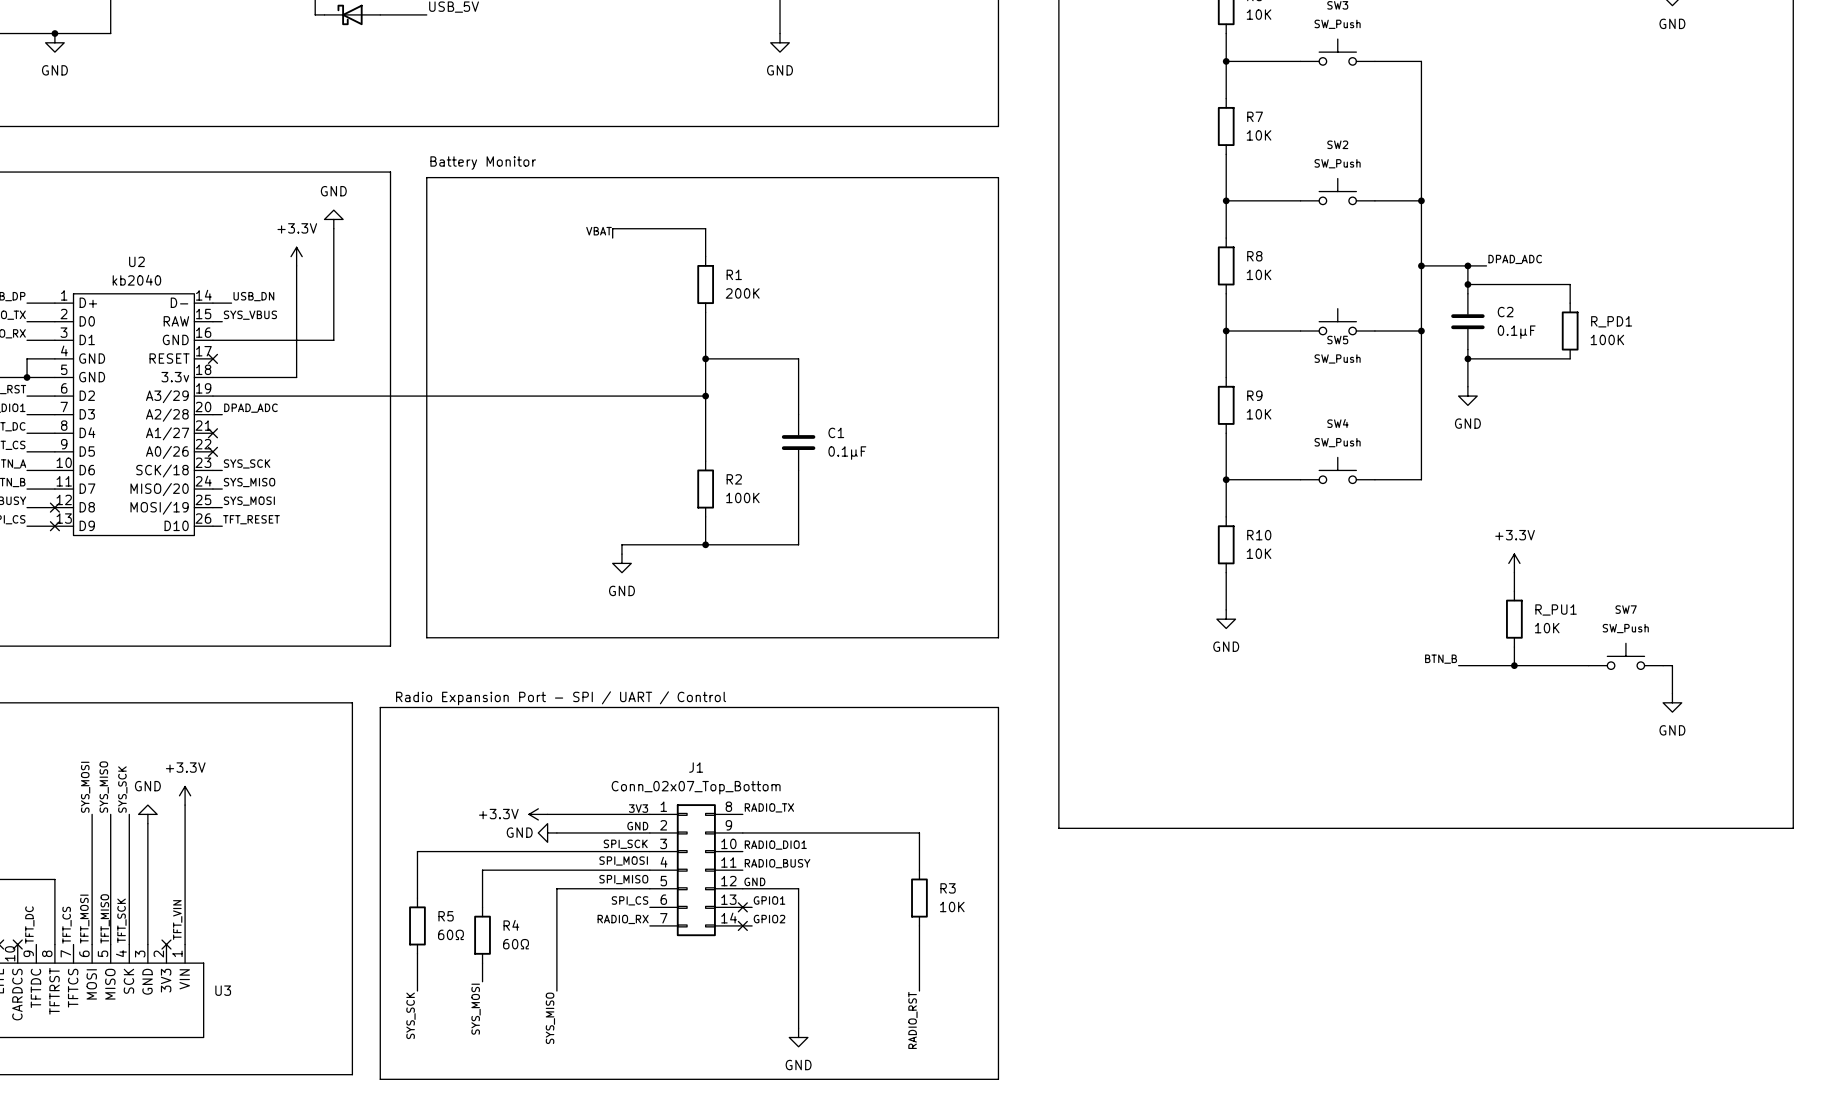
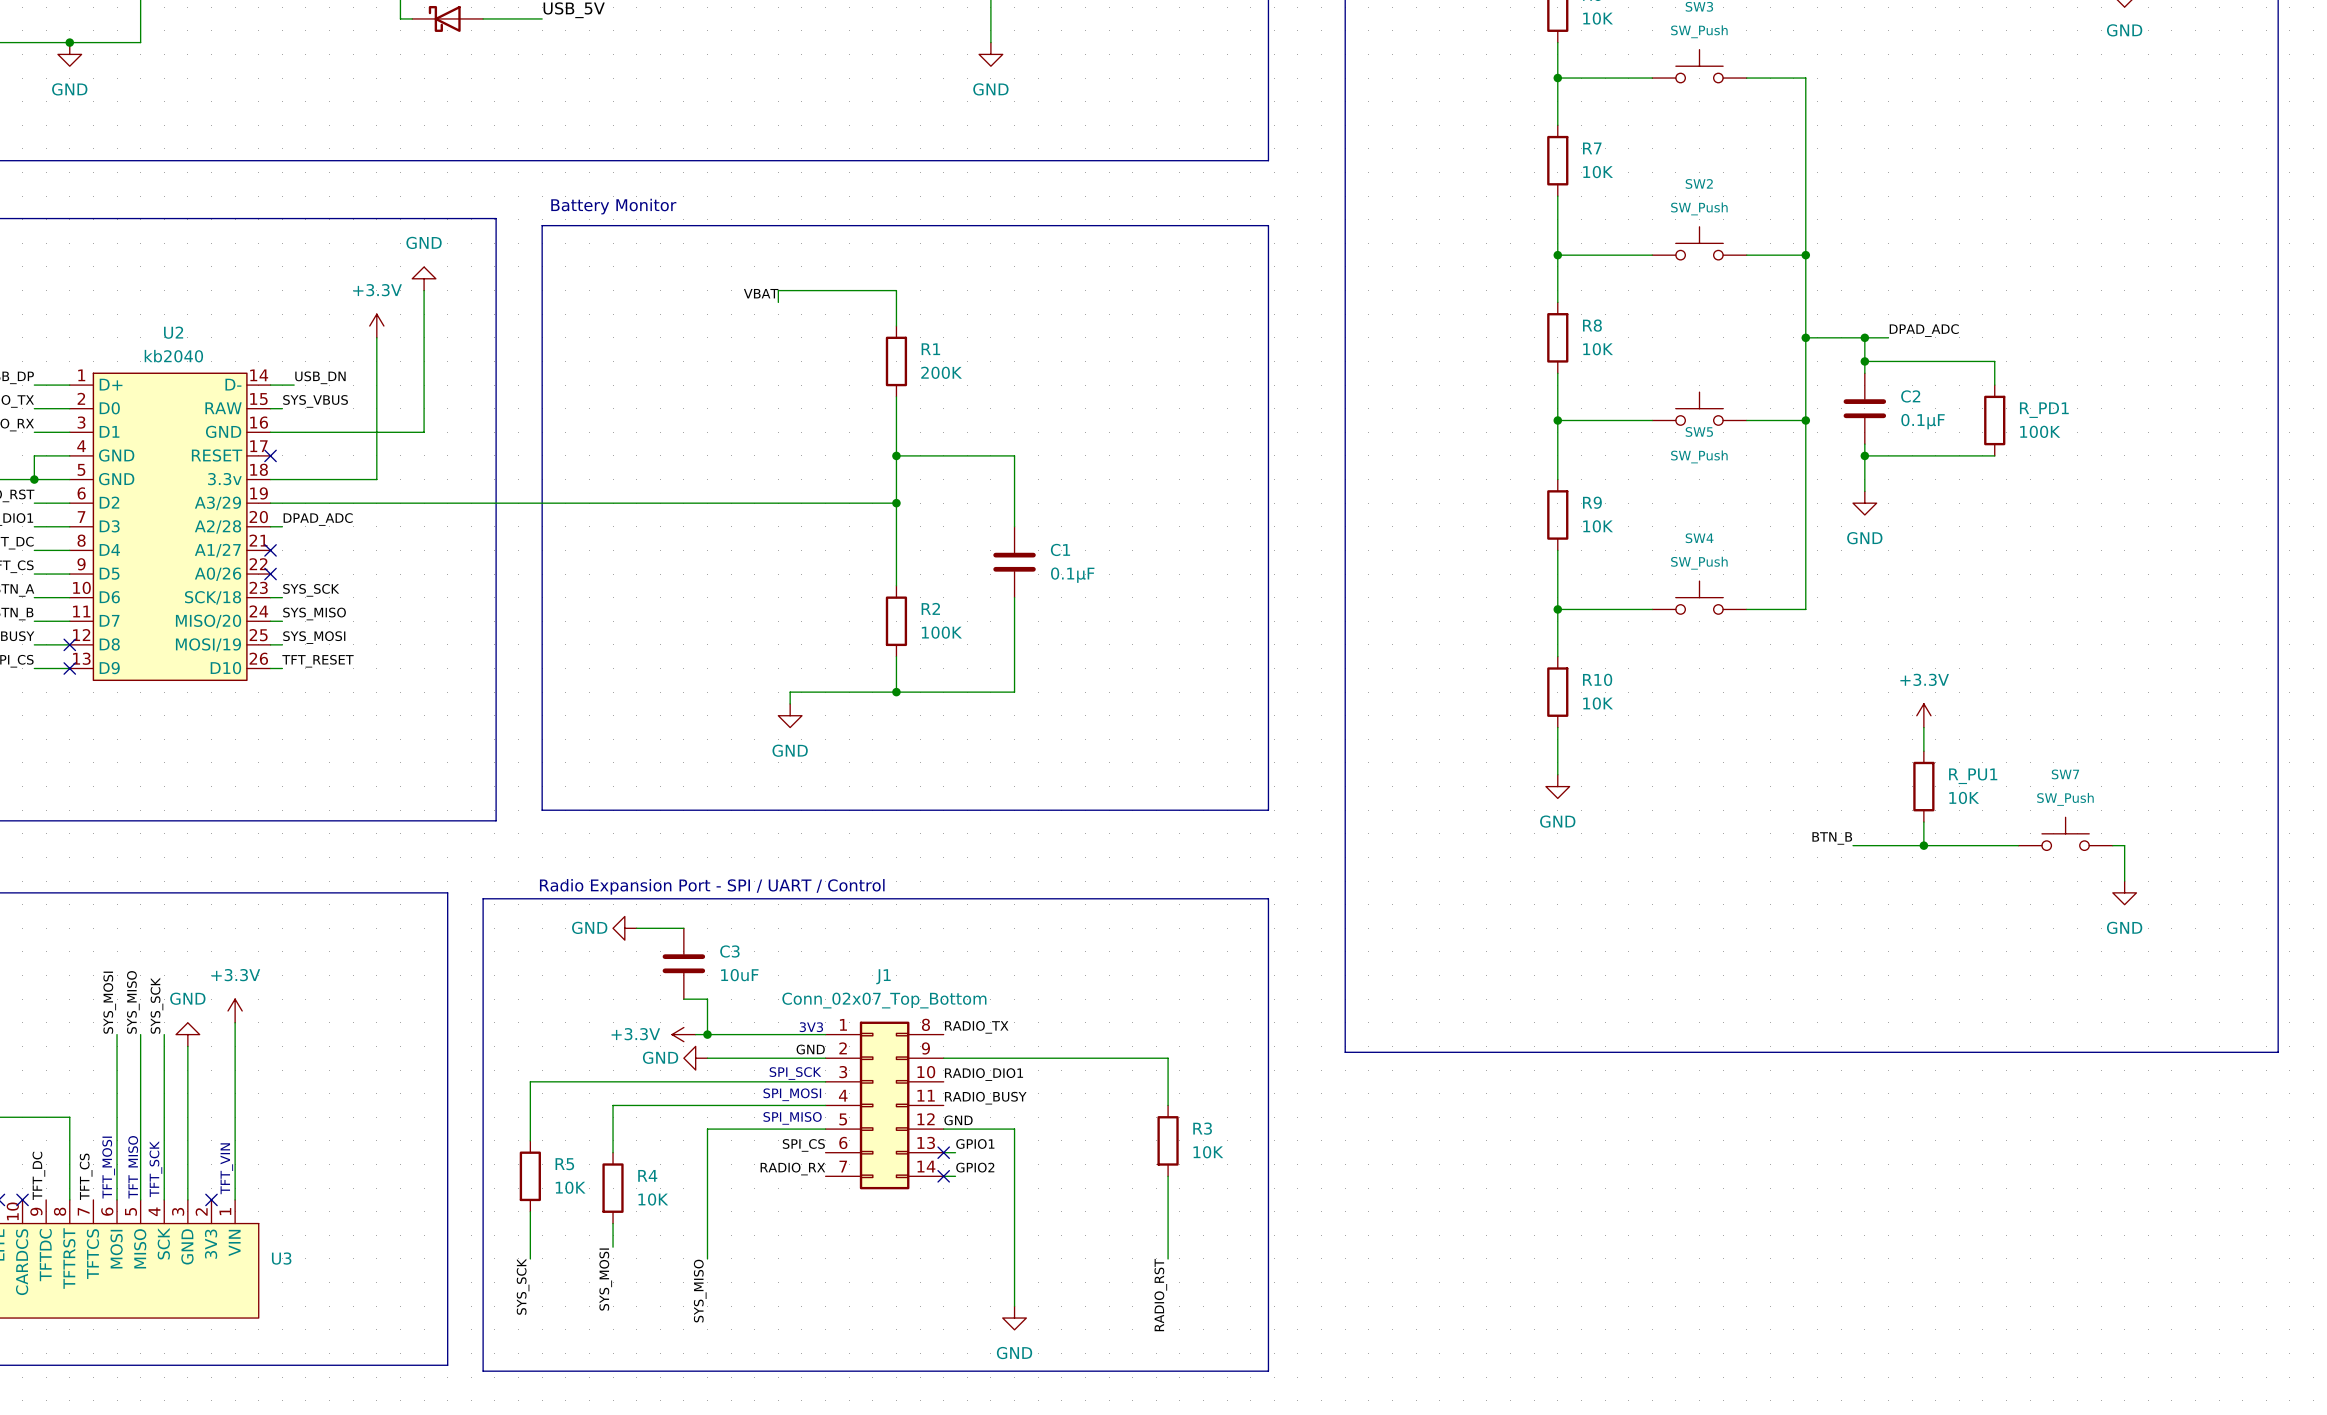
power symbol: none -> GND (624, 928)
wire: none -> (636, 928) (683, 928)
C3: none -> 10uF (683, 963)
wire: none -> (683, 999) (707, 999) (707, 1034)
junction: none -> (707, 1034)
R5 value: 60Ω (450, 934) -> 10K (570, 1187)
R4 value: 60Ω (516, 944) -> 10K (653, 1199)

